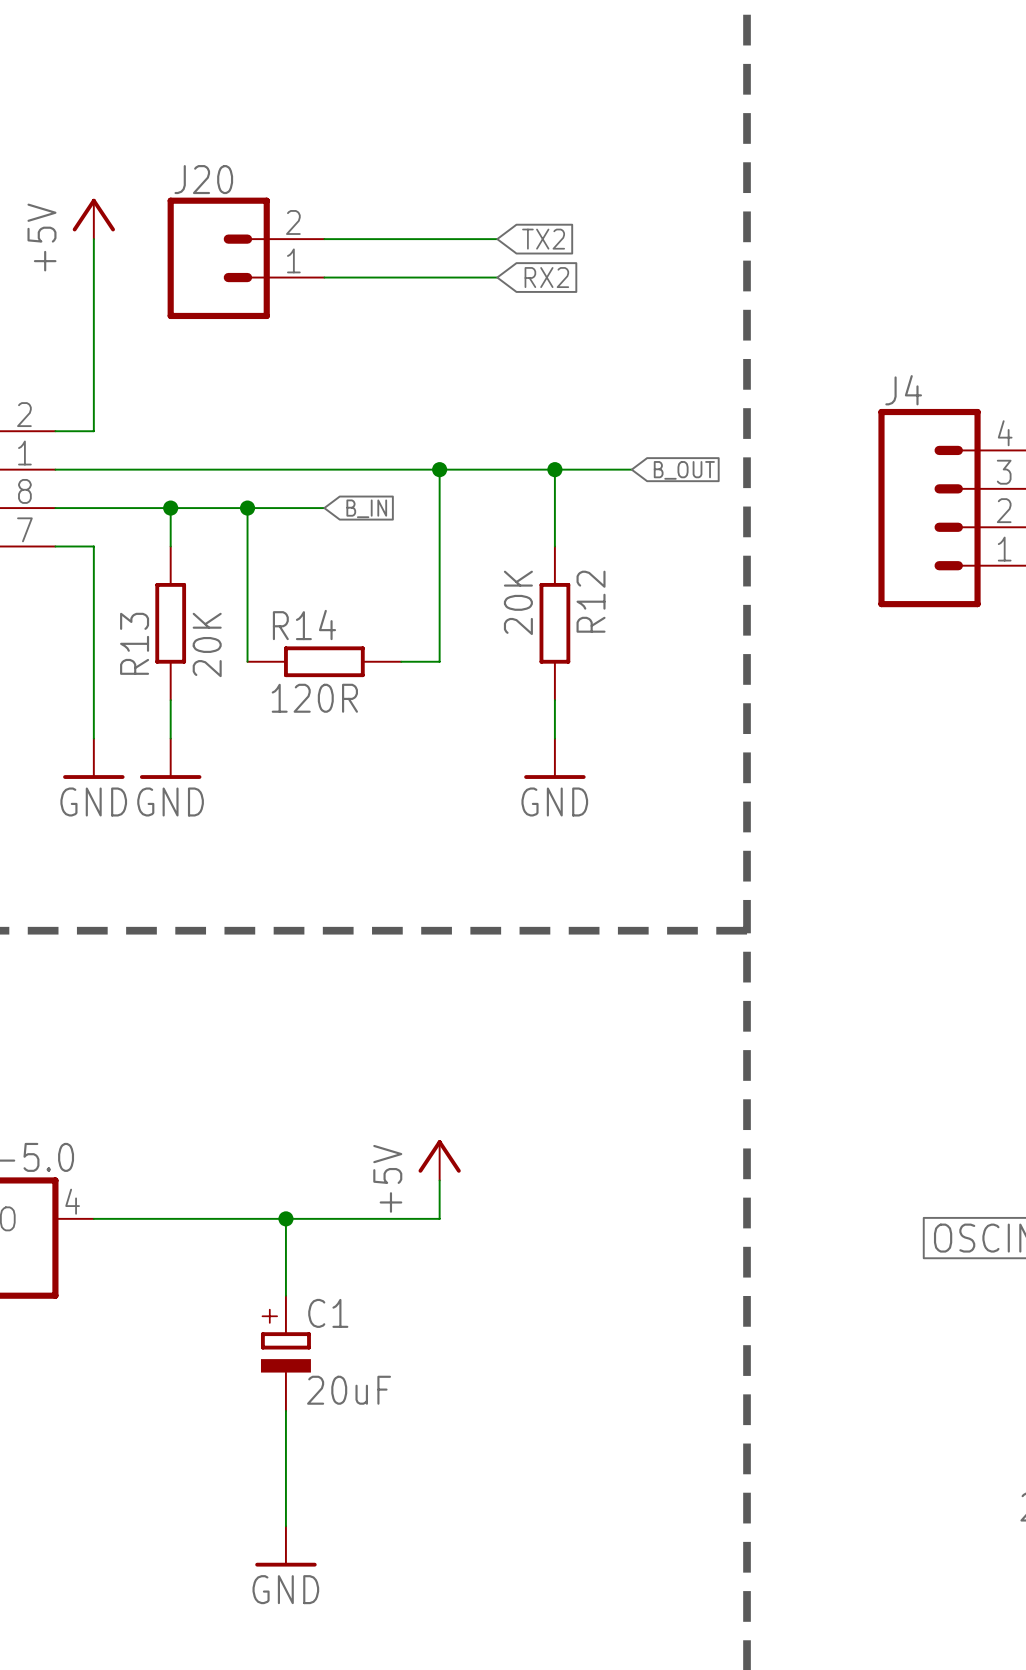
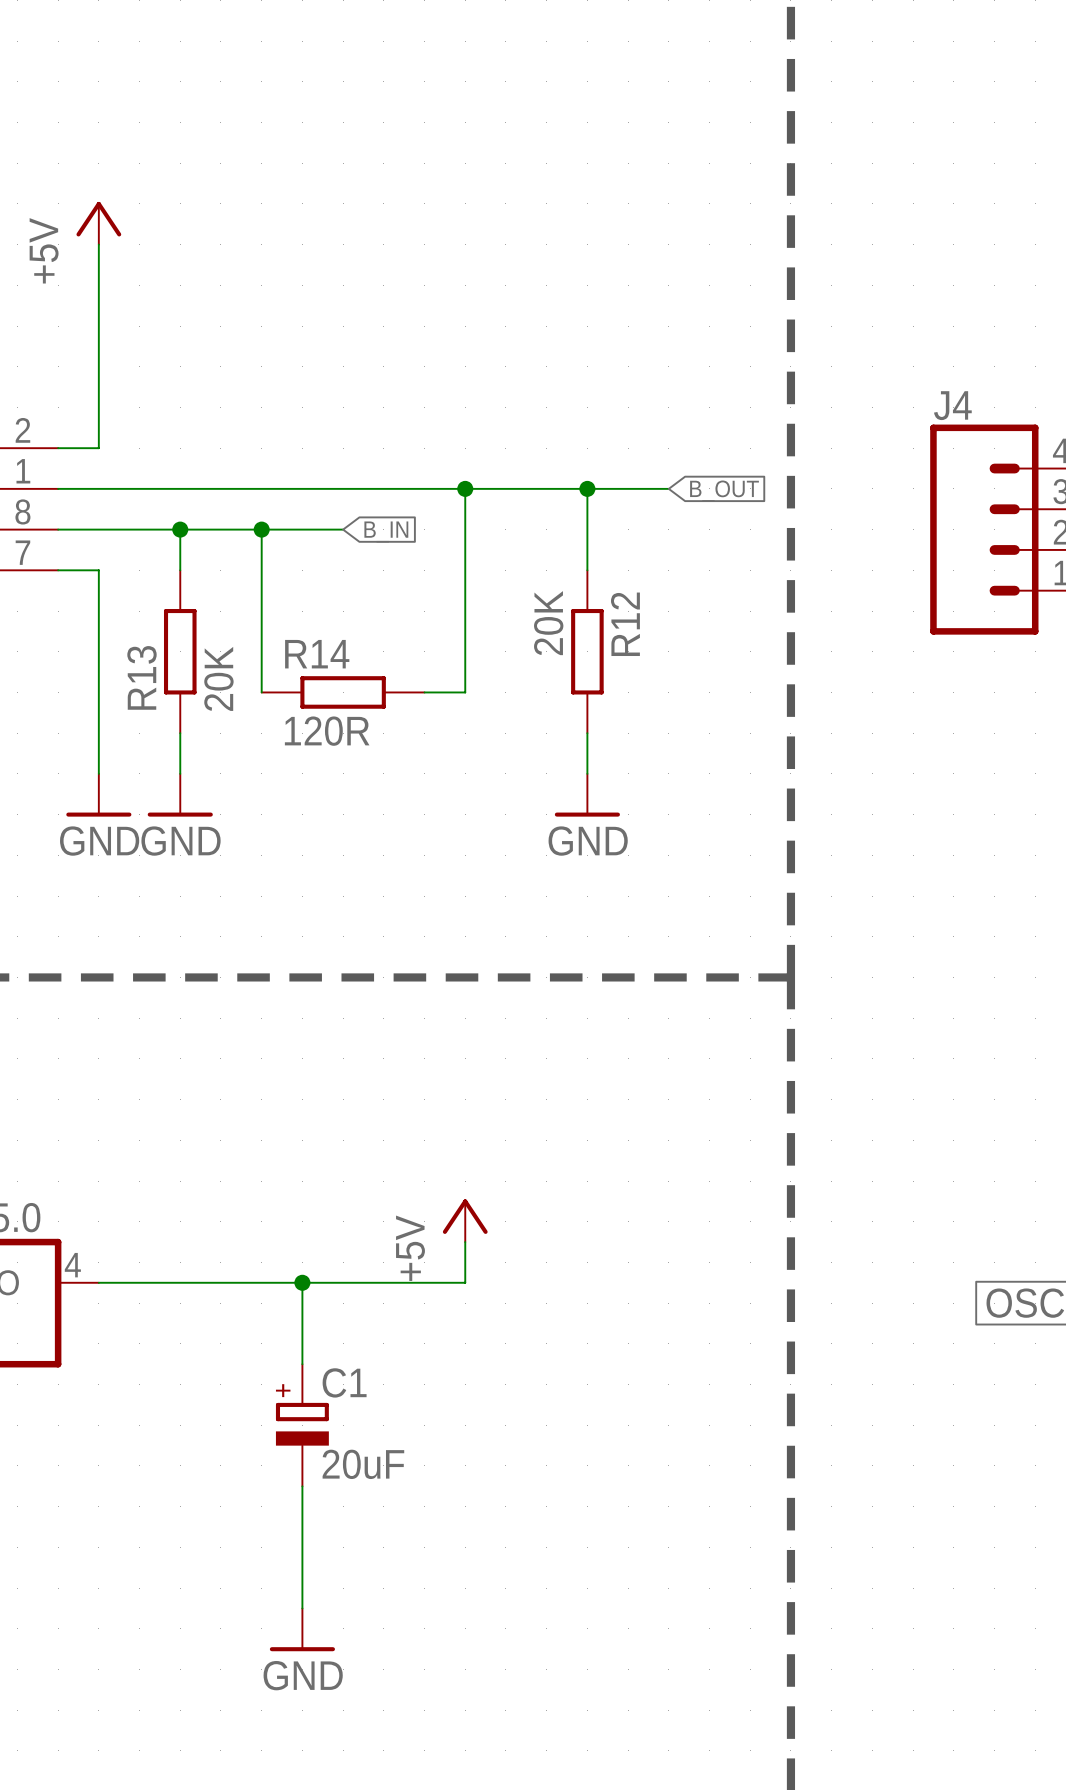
wire: (324, 239) (497, 239) -> none
global label: TX2 (543, 239) -> none
J20: (245, 258) -> none
wire: (324, 277) (497, 277) -> none
global label: RX2 (546, 277) -> none

